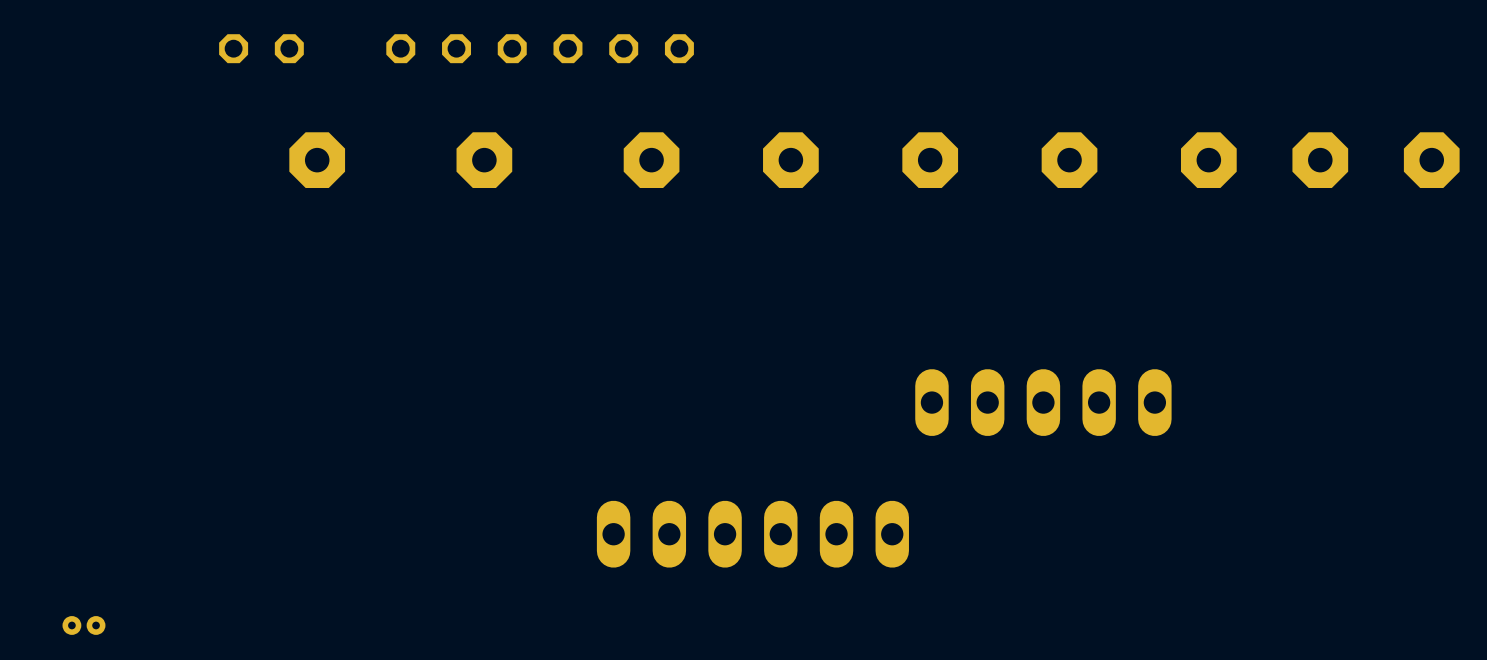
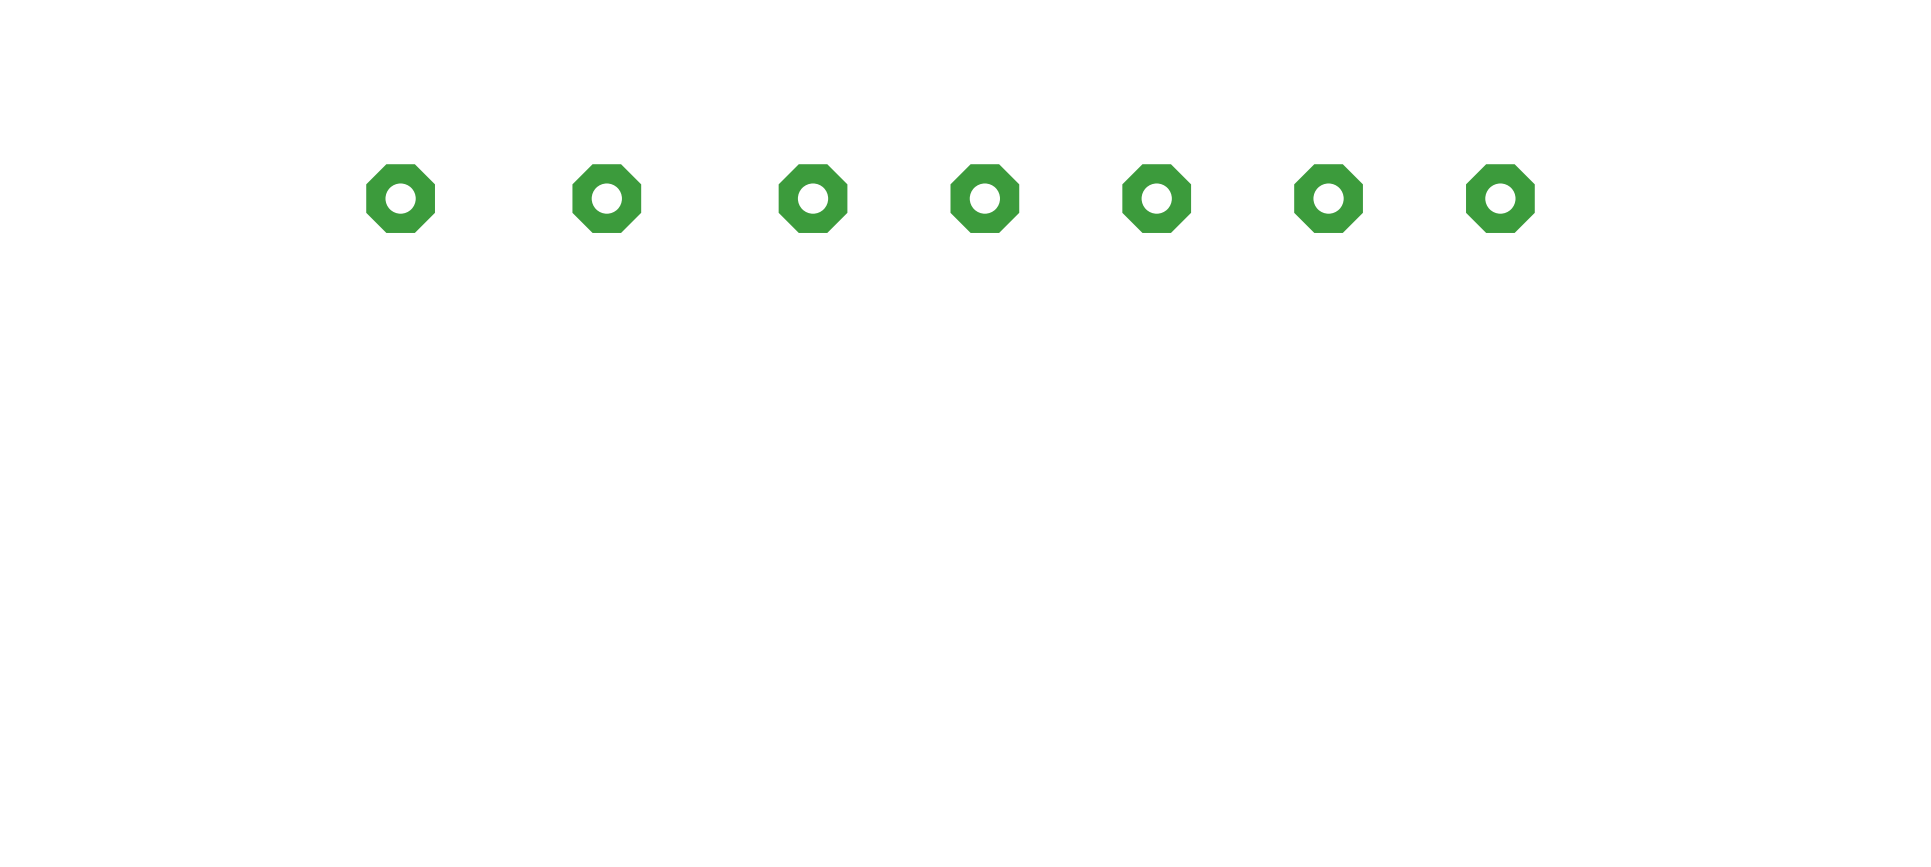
part: (261, 48) -> none
part: (428, 48) -> none
part: (540, 48) -> none
part: (651, 48) -> none
part: (1320, 160) -> none
part: (1431, 160) -> none
part: (1043, 402) -> none
part: (752, 534) -> none
part: (83, 625) -> none

